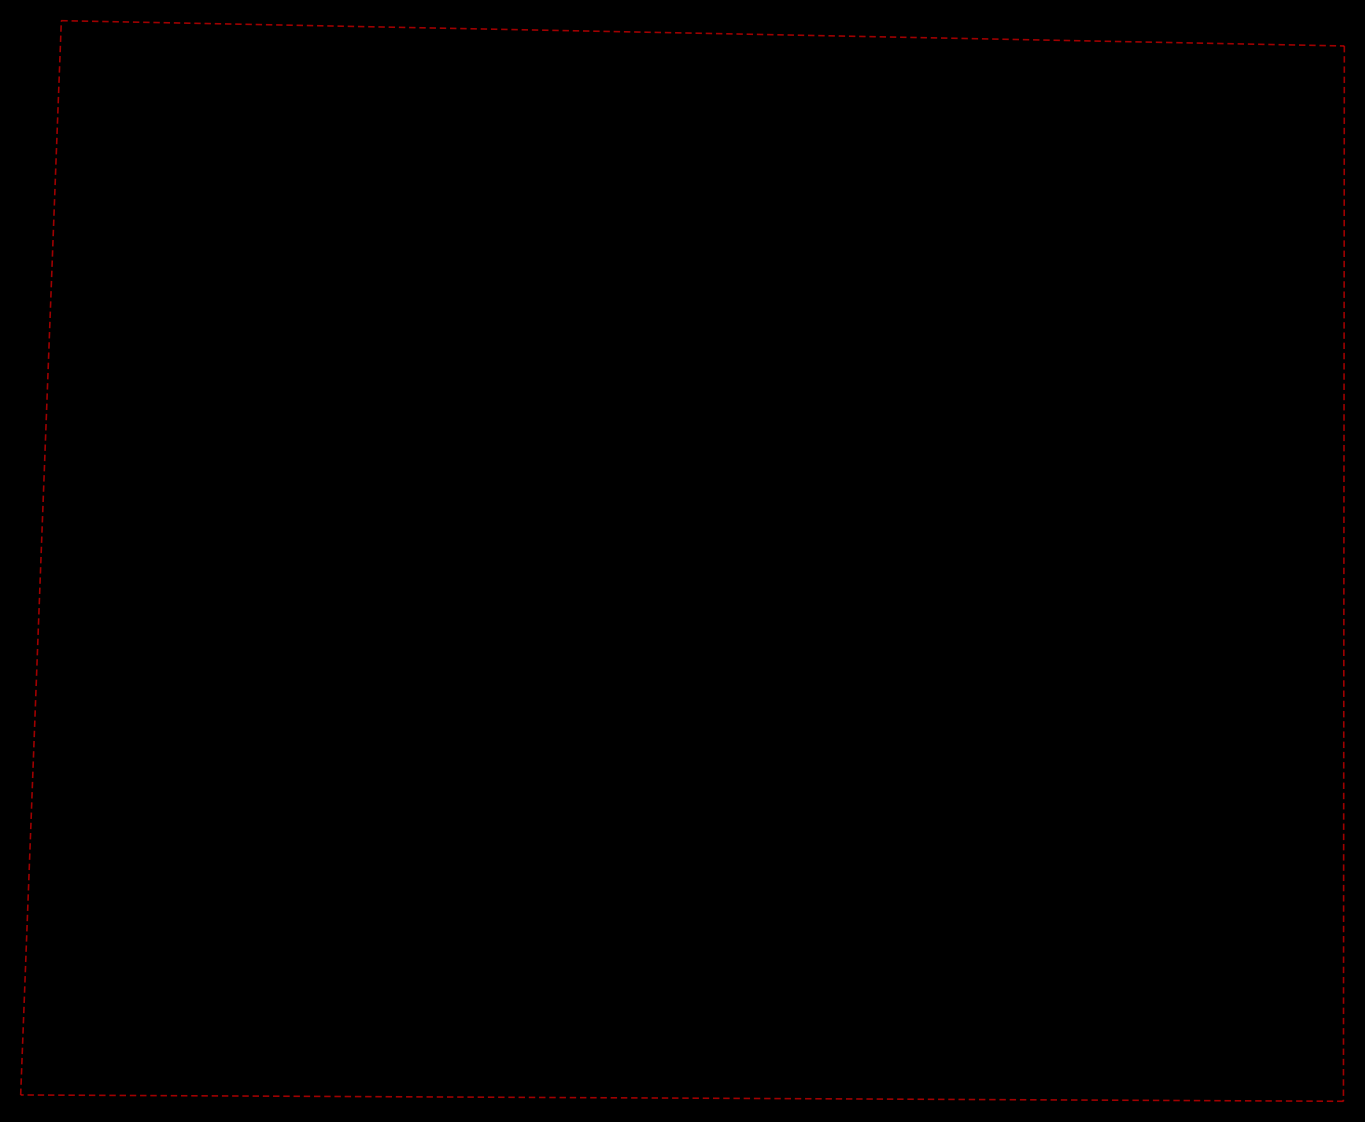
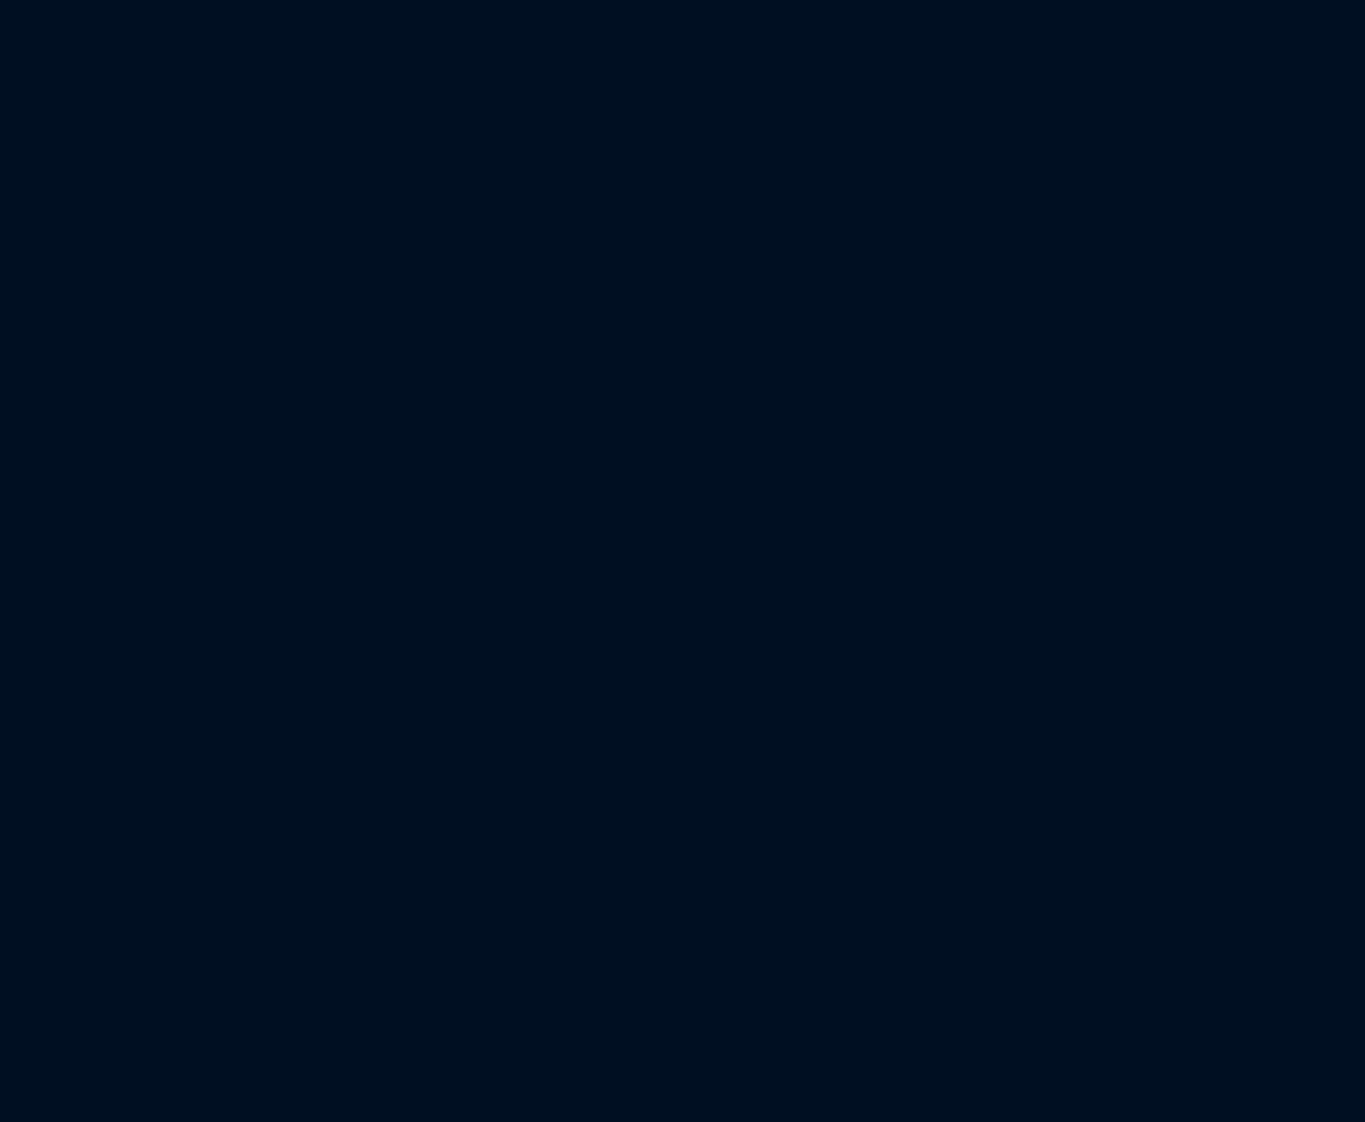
top zone outline: (61, 20) (20, 1094) (1343, 1101) (1344, 45) (61, 20) -> none

